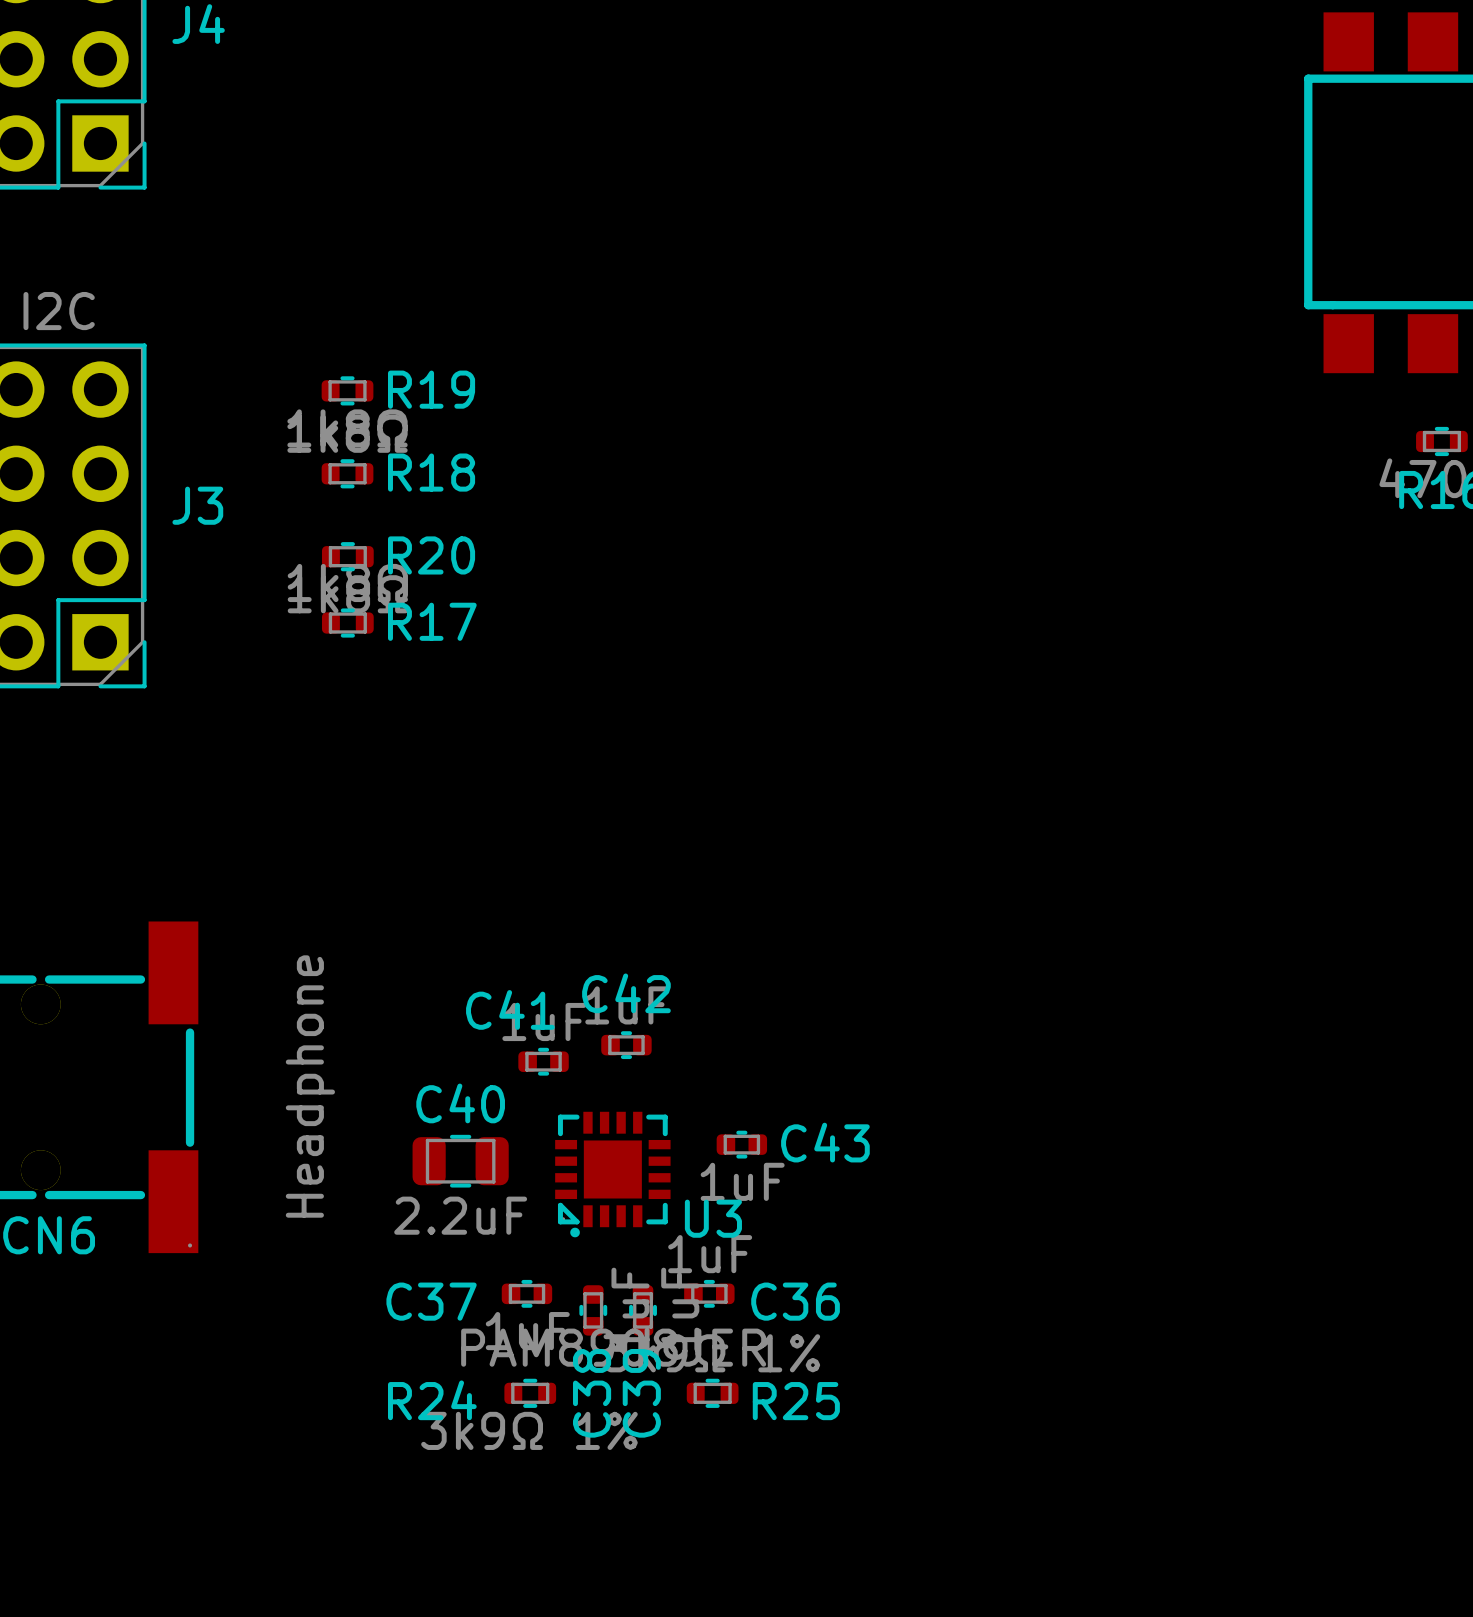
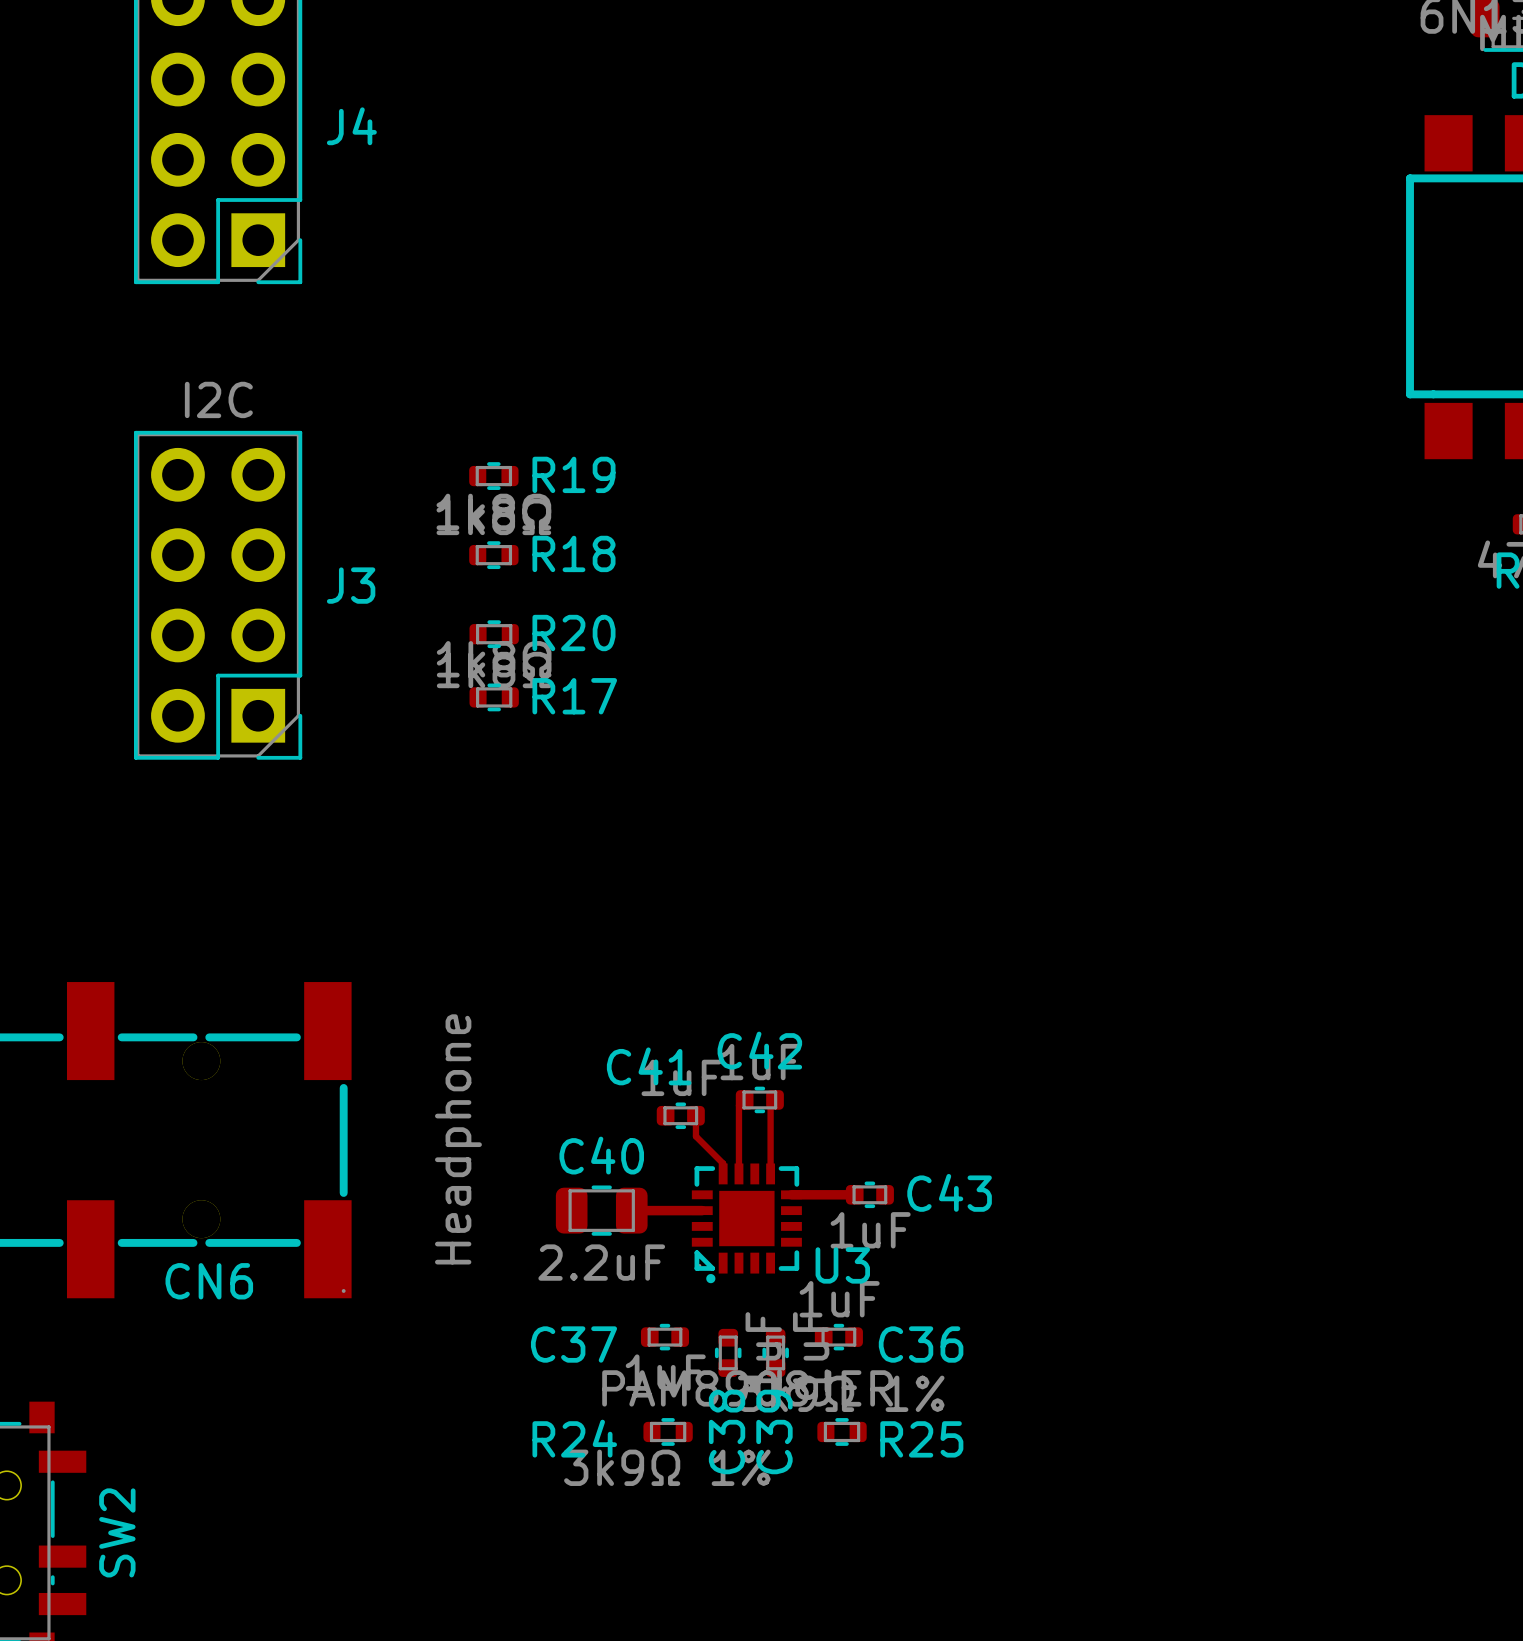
track: none -> (744, 1099) (738, 1105) (738, 1173)
track: none -> (775, 1099) (770, 1104) (770, 1173)
track: none -> (695, 1115) (695, 1136) (723, 1163) (723, 1173)
track: none -> (791, 1194) (854, 1194)
track: none -> (631, 1210) (702, 1210)

